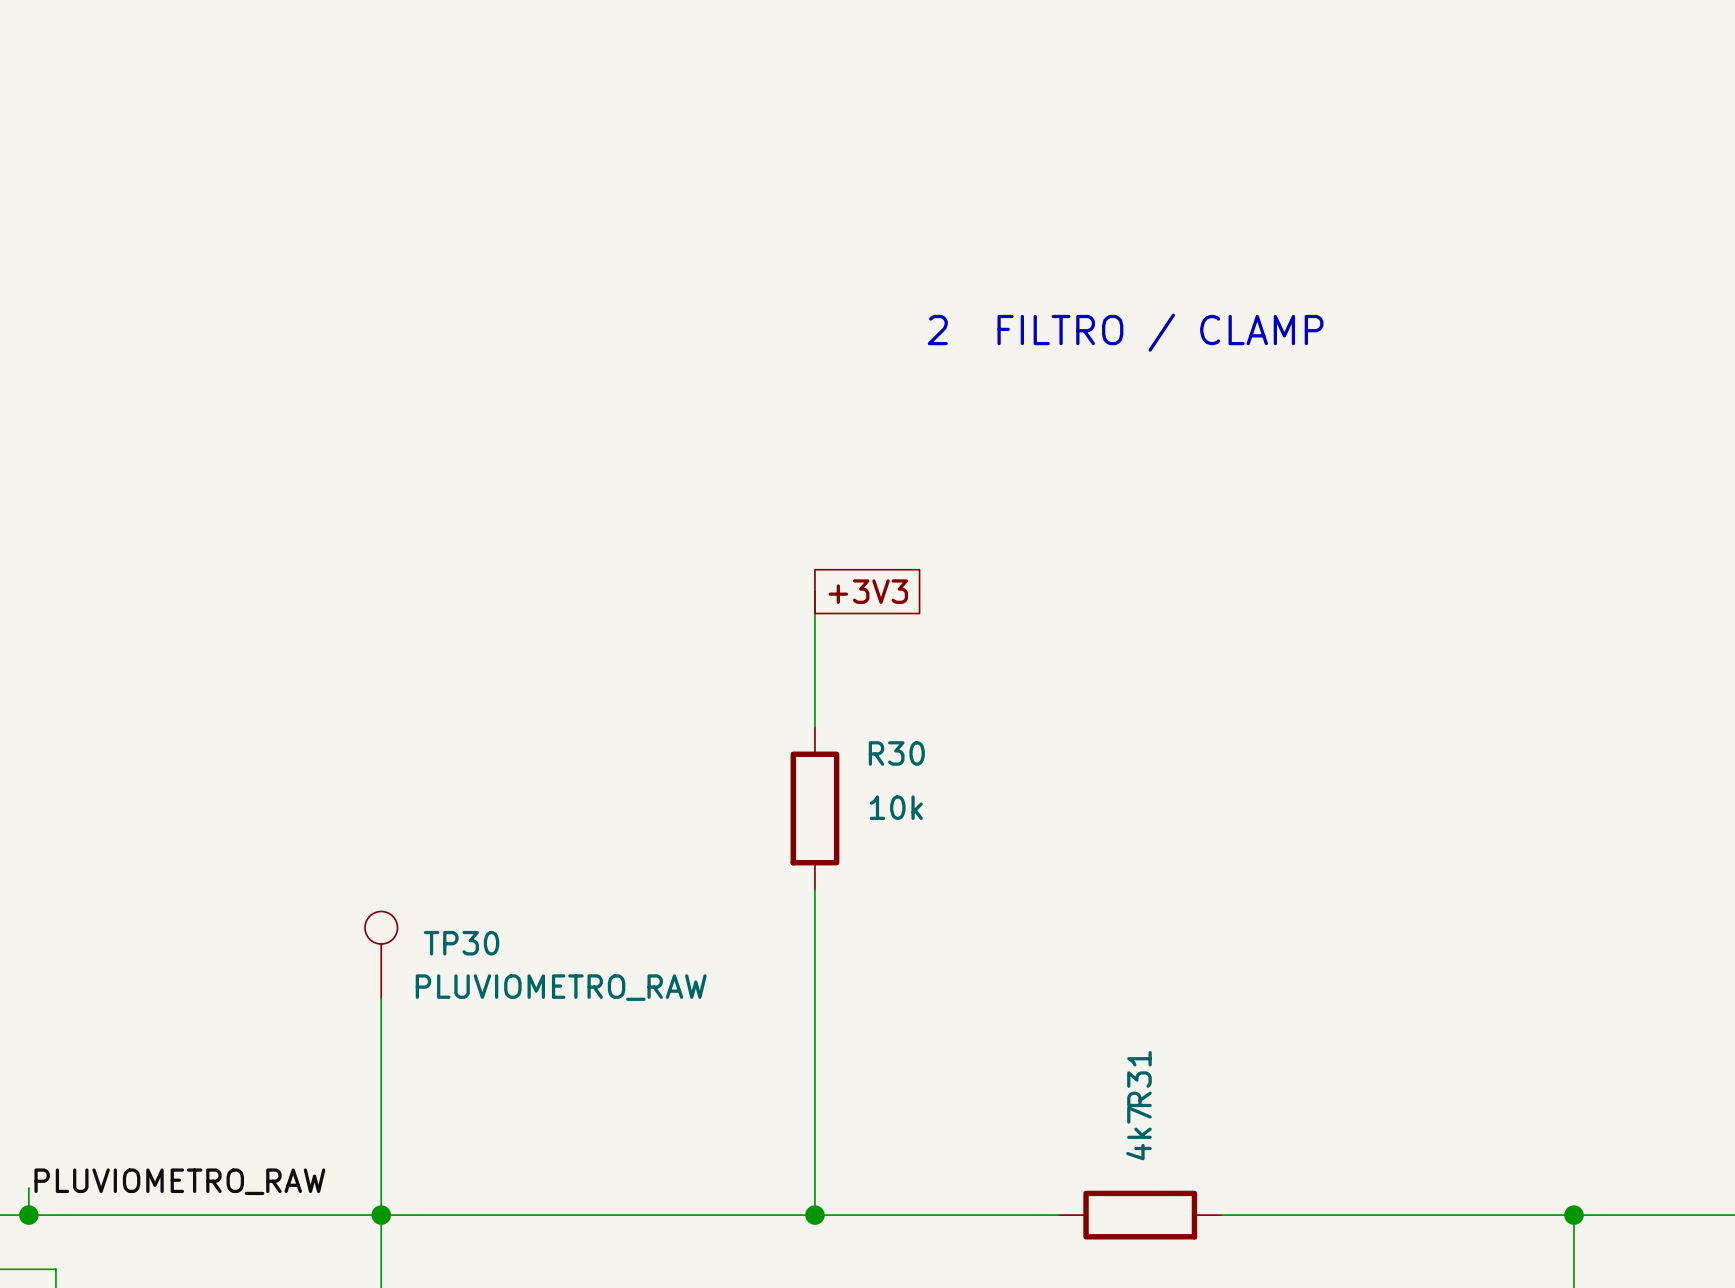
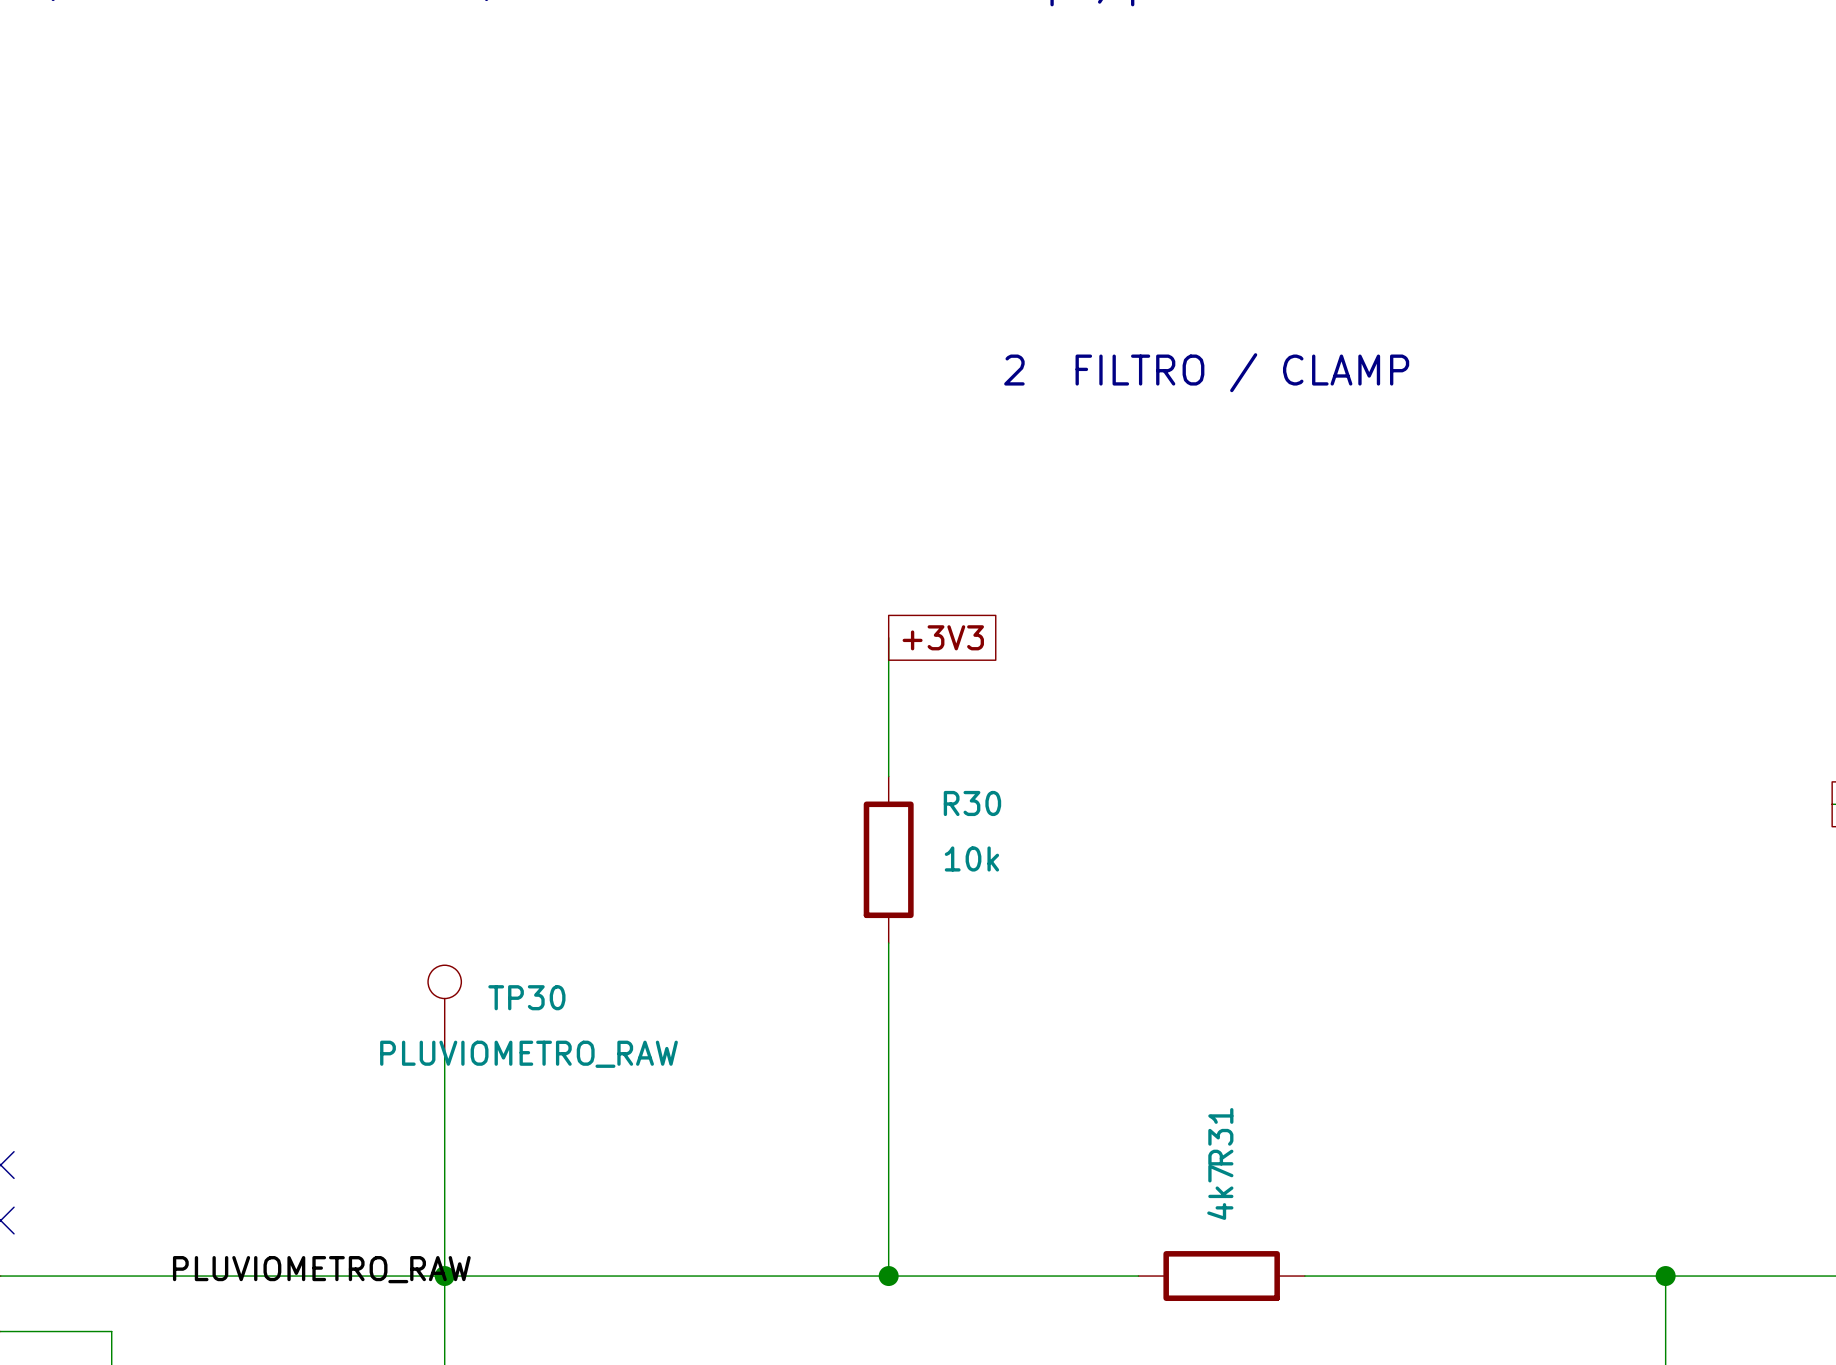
TP30 value position: PLUVIOMETRO_RAW (561, 987) -> PLUVIOMETRO_RAW (528, 1054)
label position: PLUVIOMETRO_RAW (179, 1181) -> PLUVIOMETRO_RAW (321, 1269)
wire: (28, 1187) (28, 1215) -> none
junction: (28, 1215) -> none

